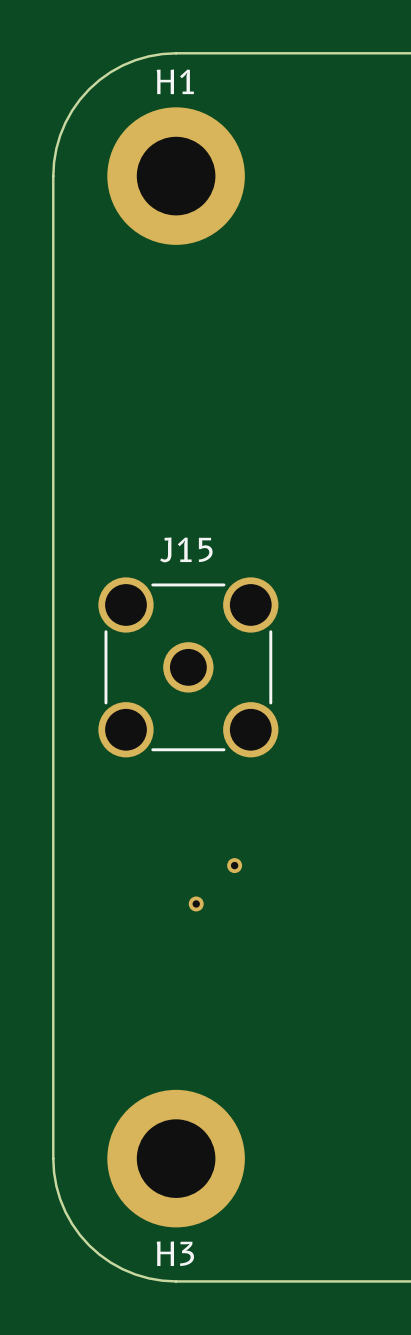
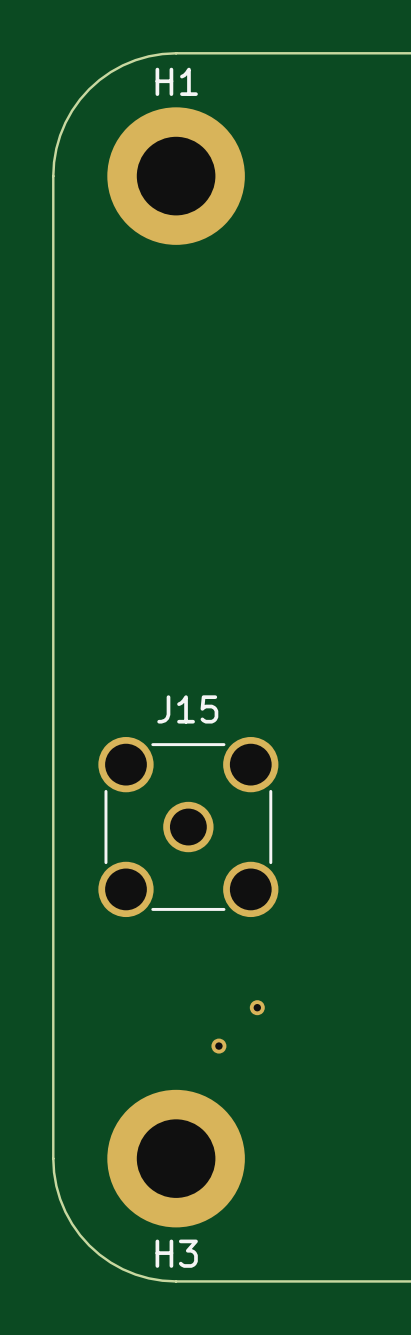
J15 position: (188, 667) -> (188, 827)
part position: (215, 884) -> (238, 1026)

